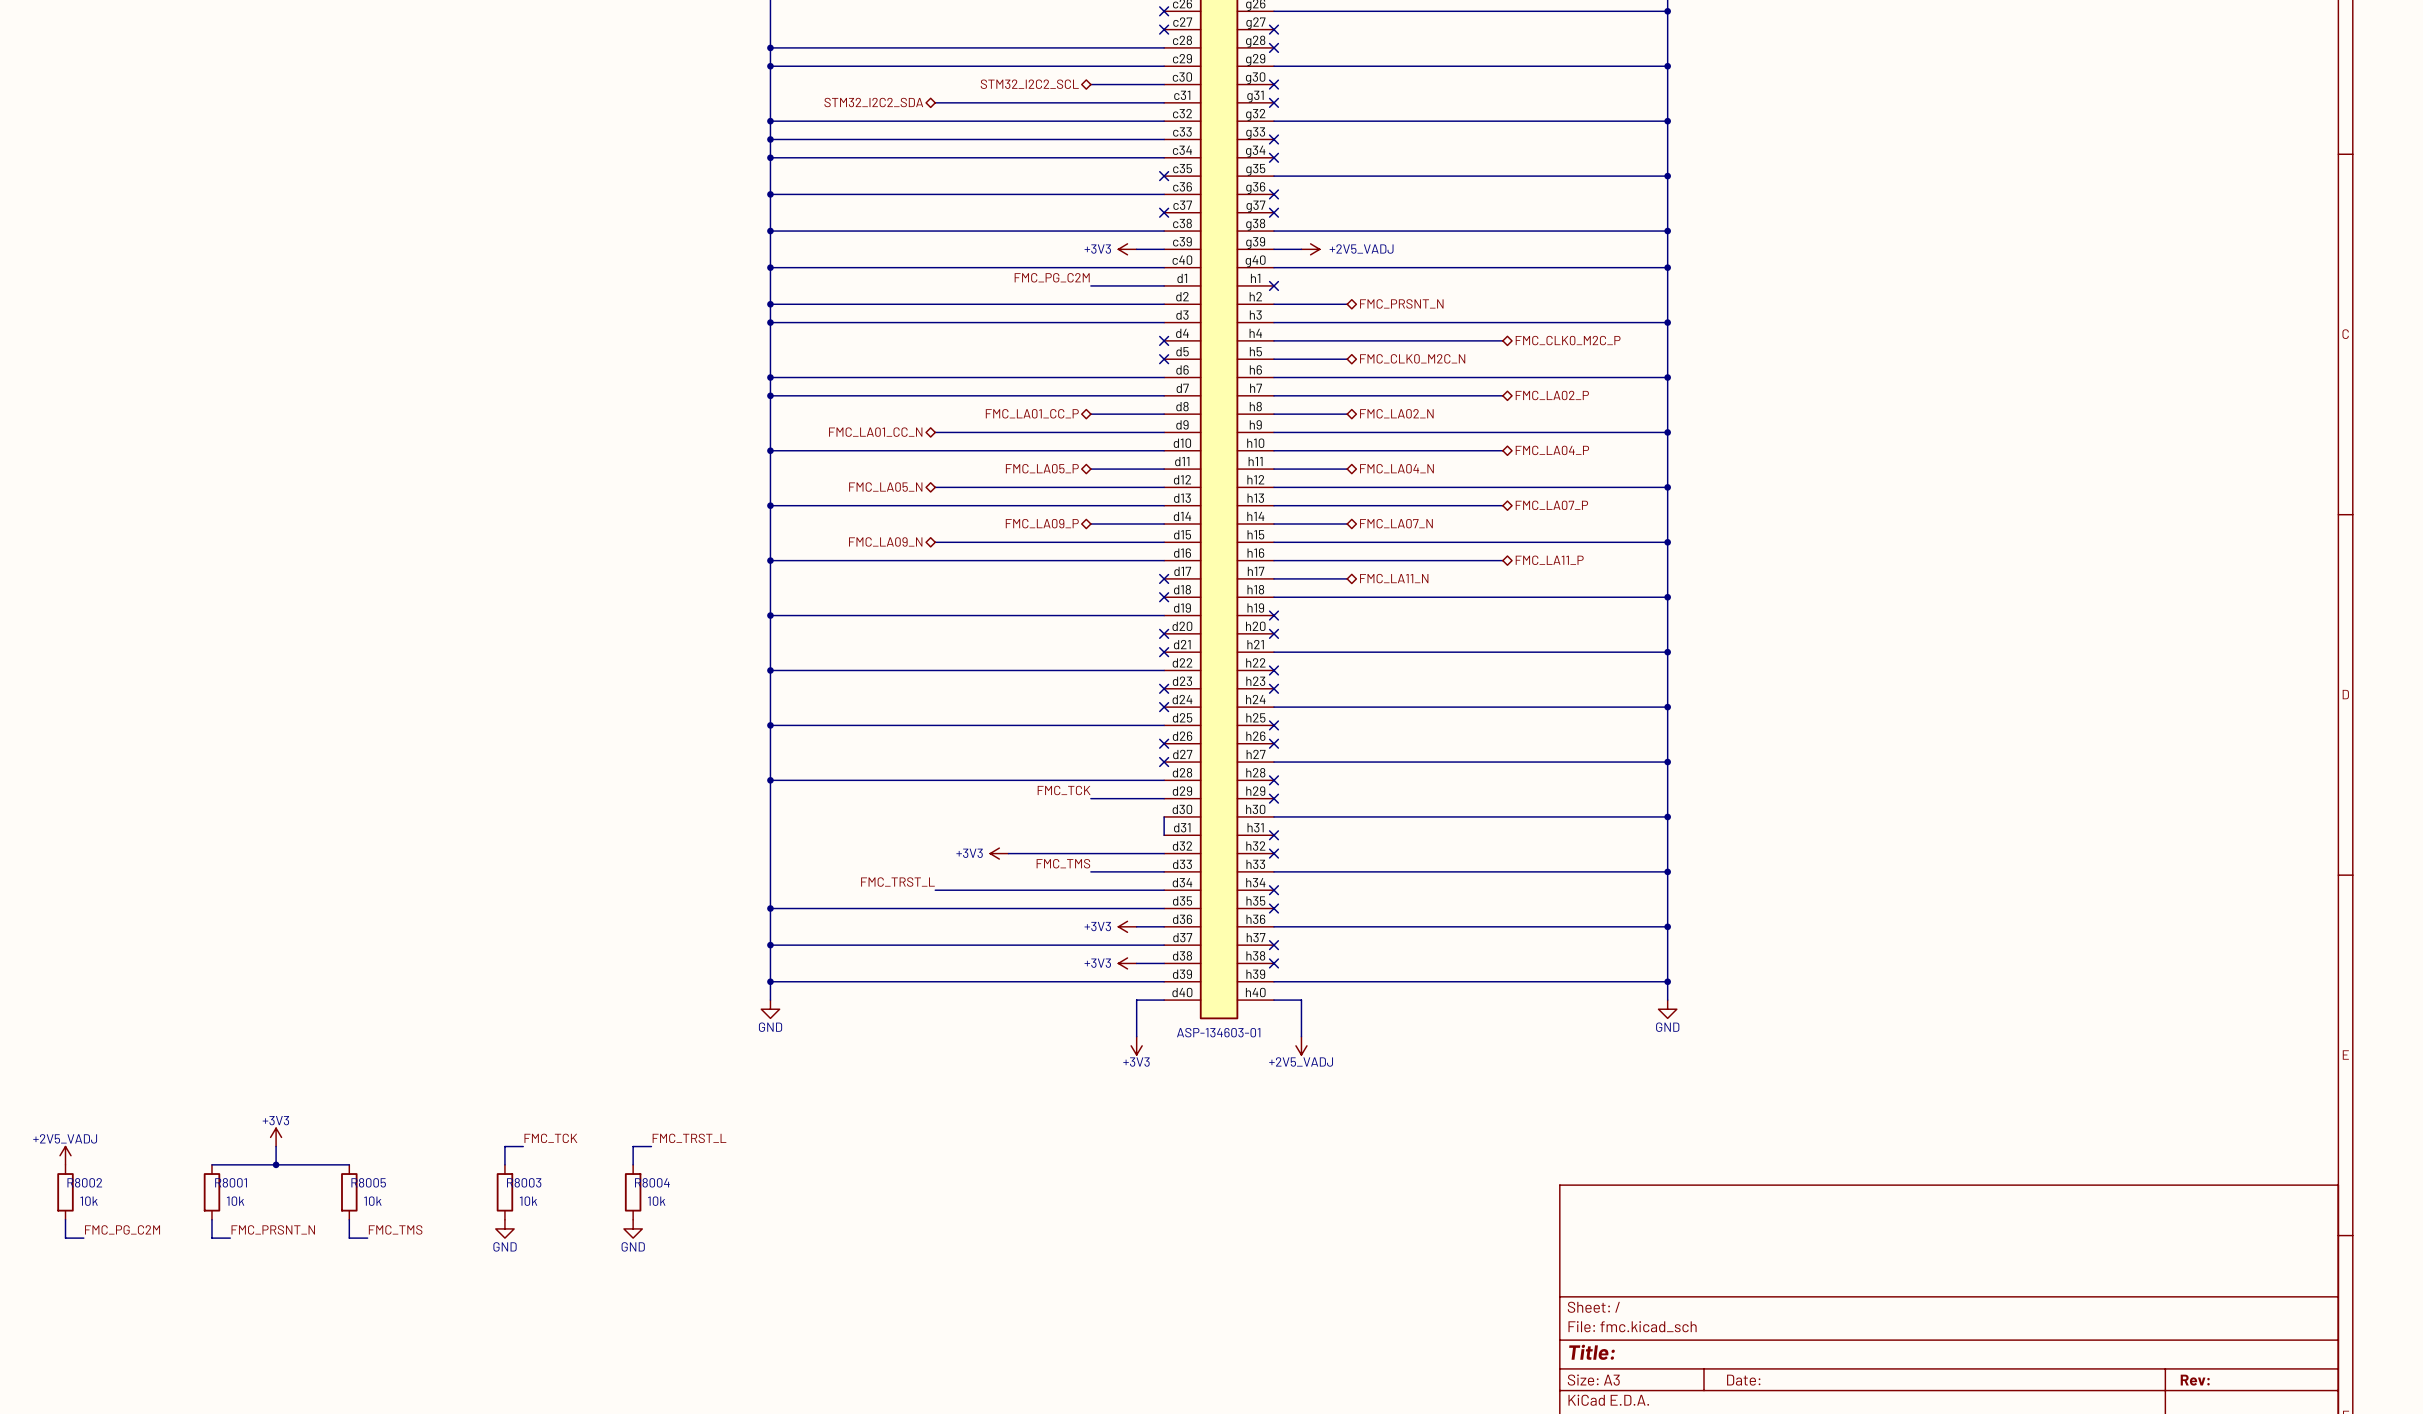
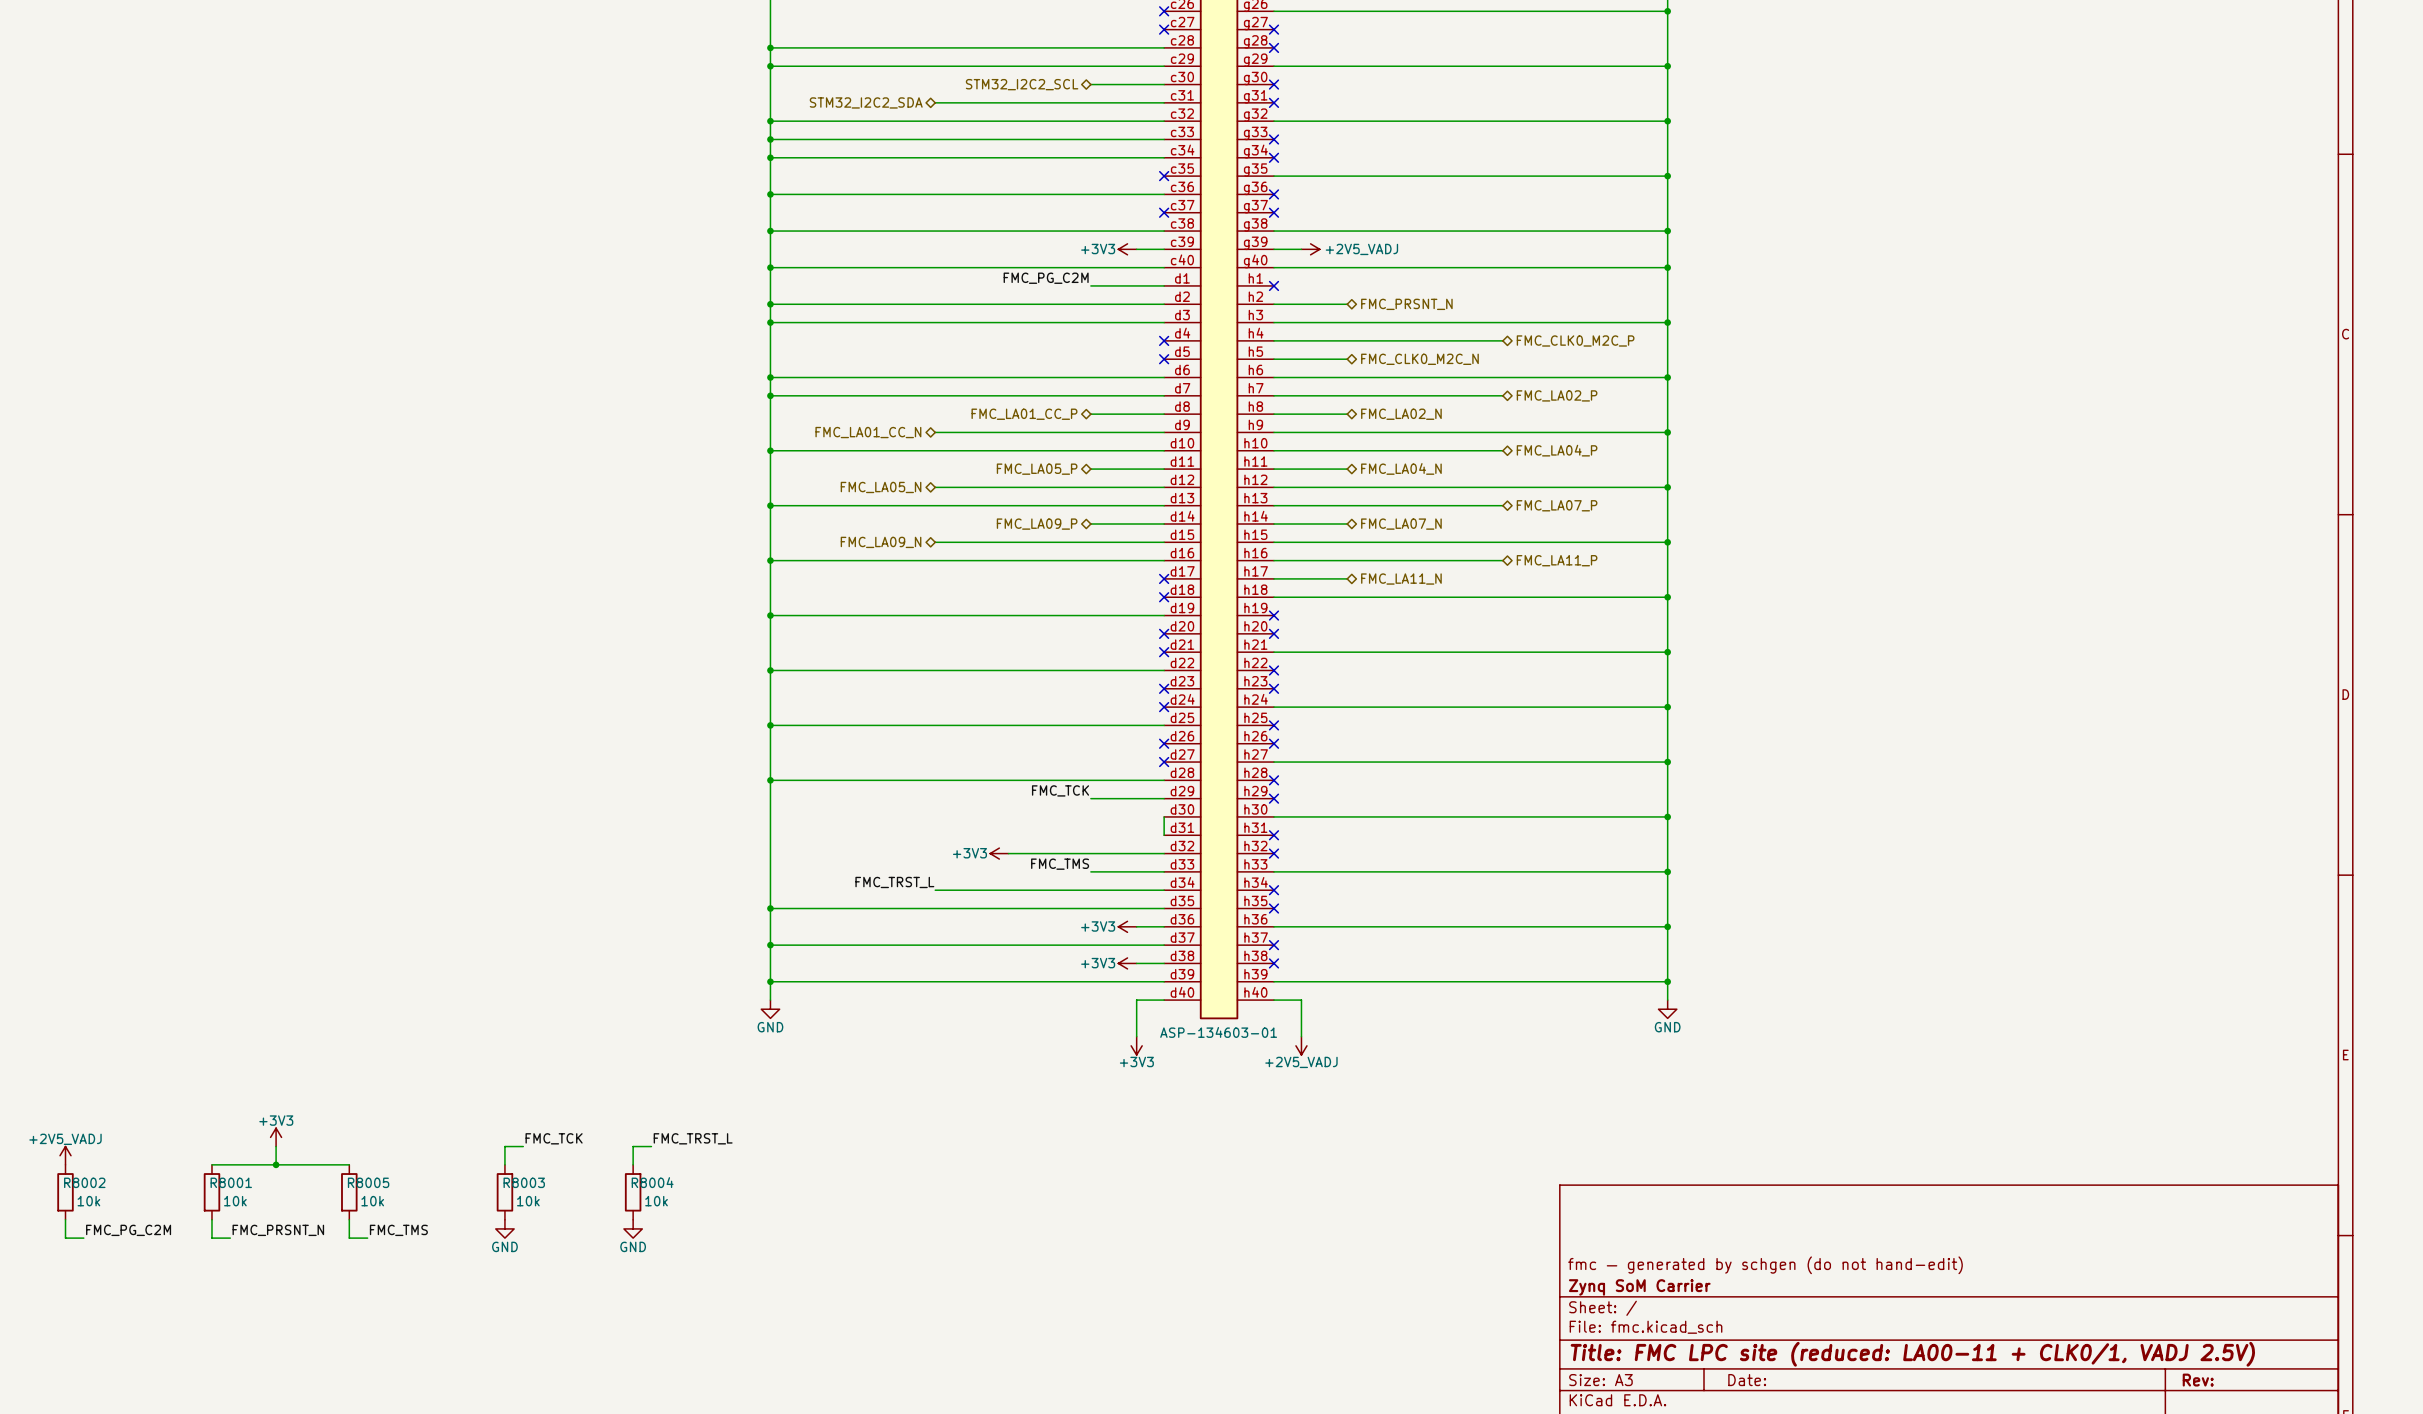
title block: none -> fmc — generated by schgen (do not hand-edit) (1765, 1265)
title block: none -> Zynq SoM Carrier (1639, 1287)
title block: Title: (1592, 1352) -> Title: FMC LPC site (reduced: LA00-11 + CLK0/1, VADJ 2.5V) (1912, 1354)

